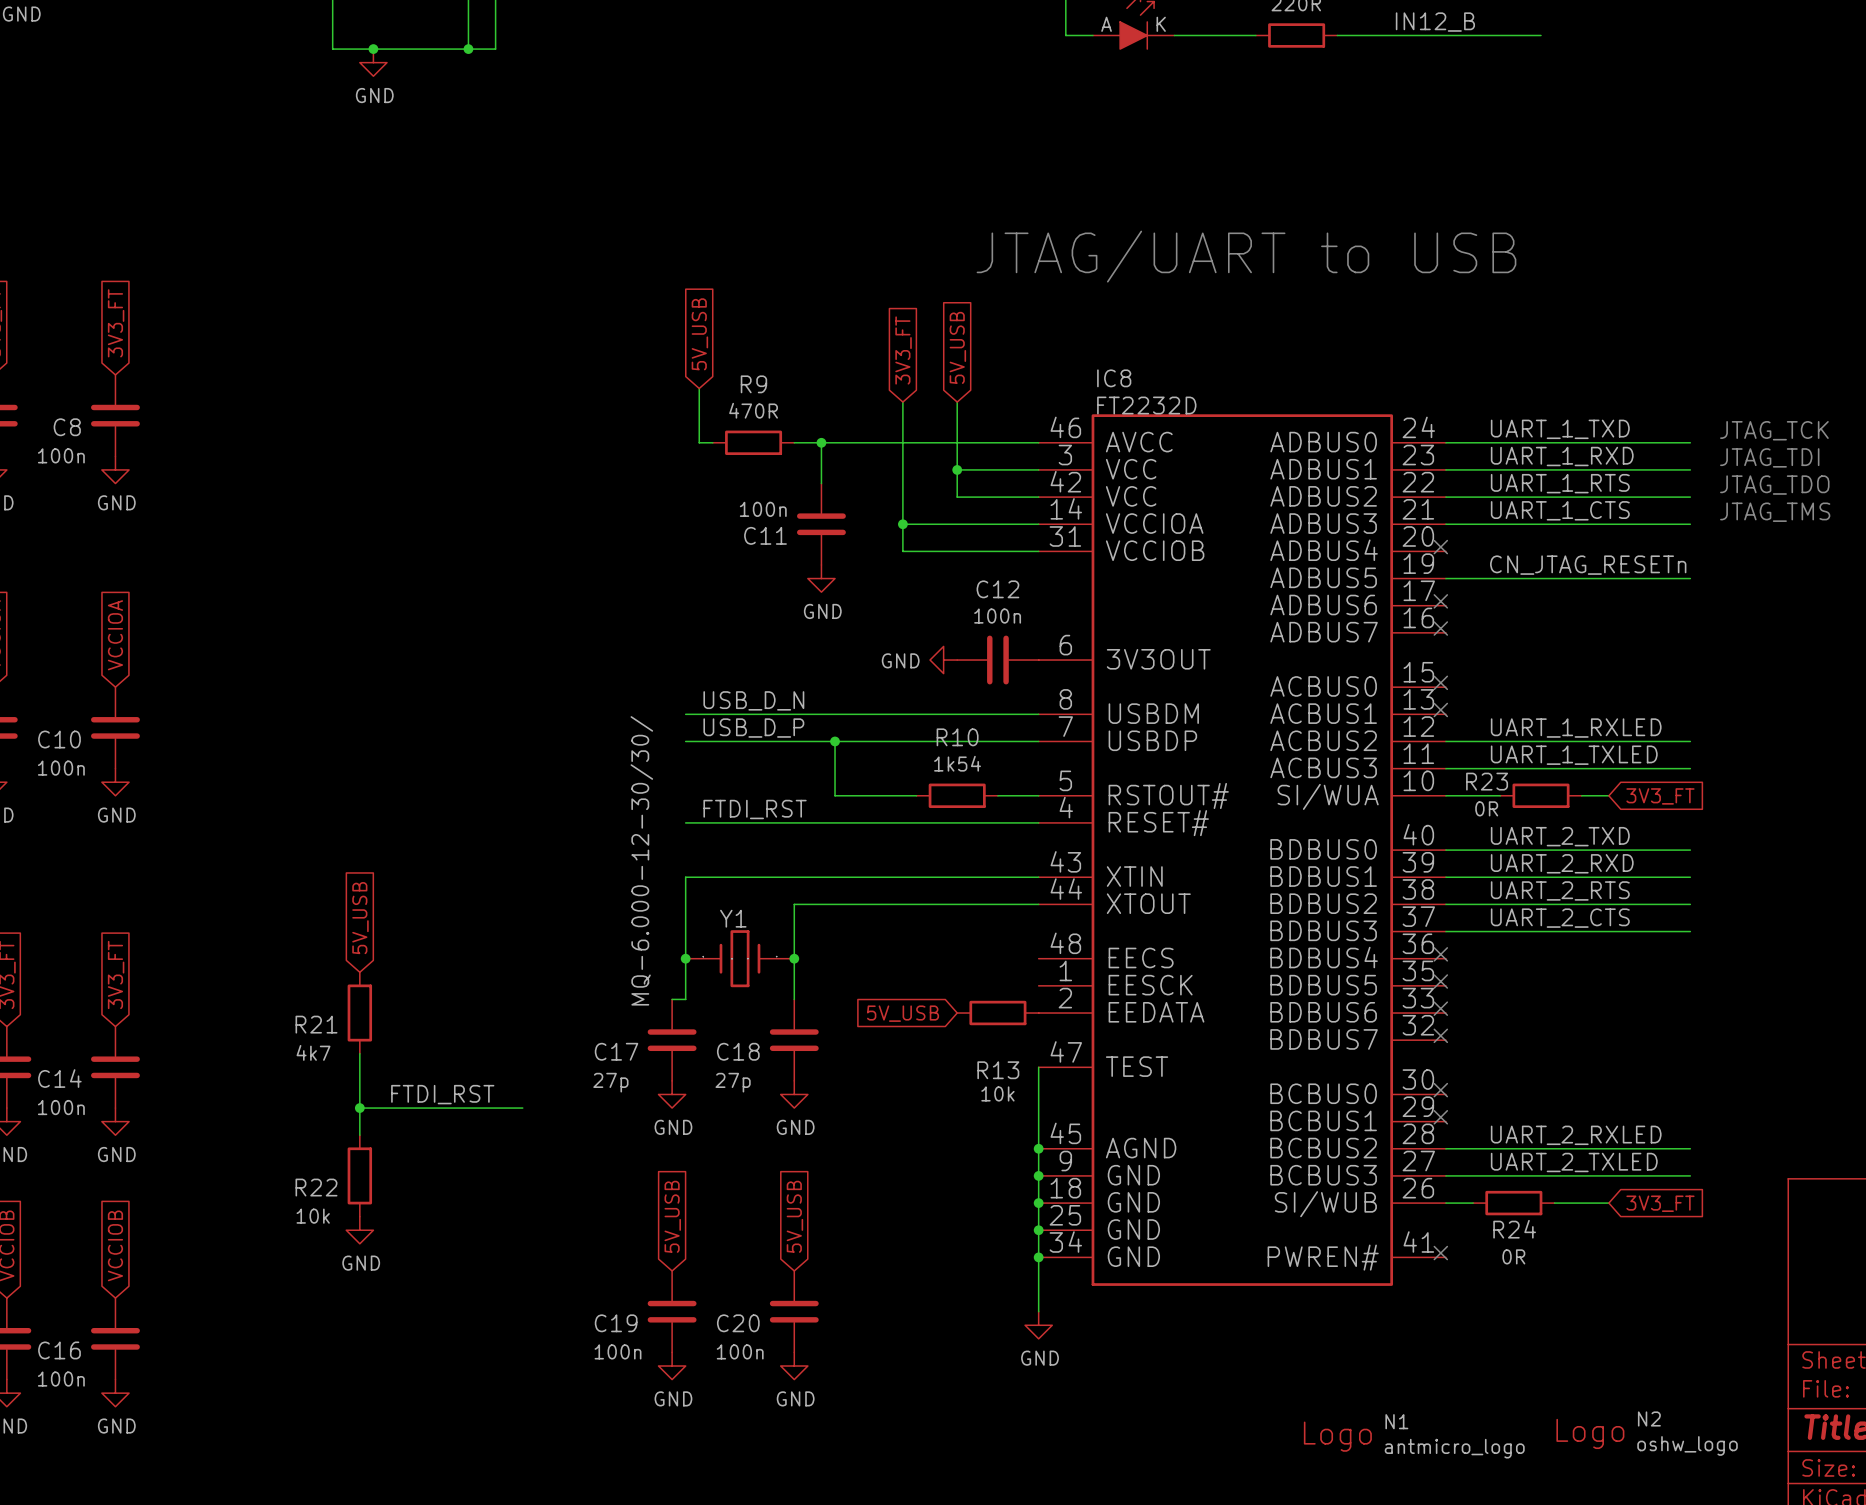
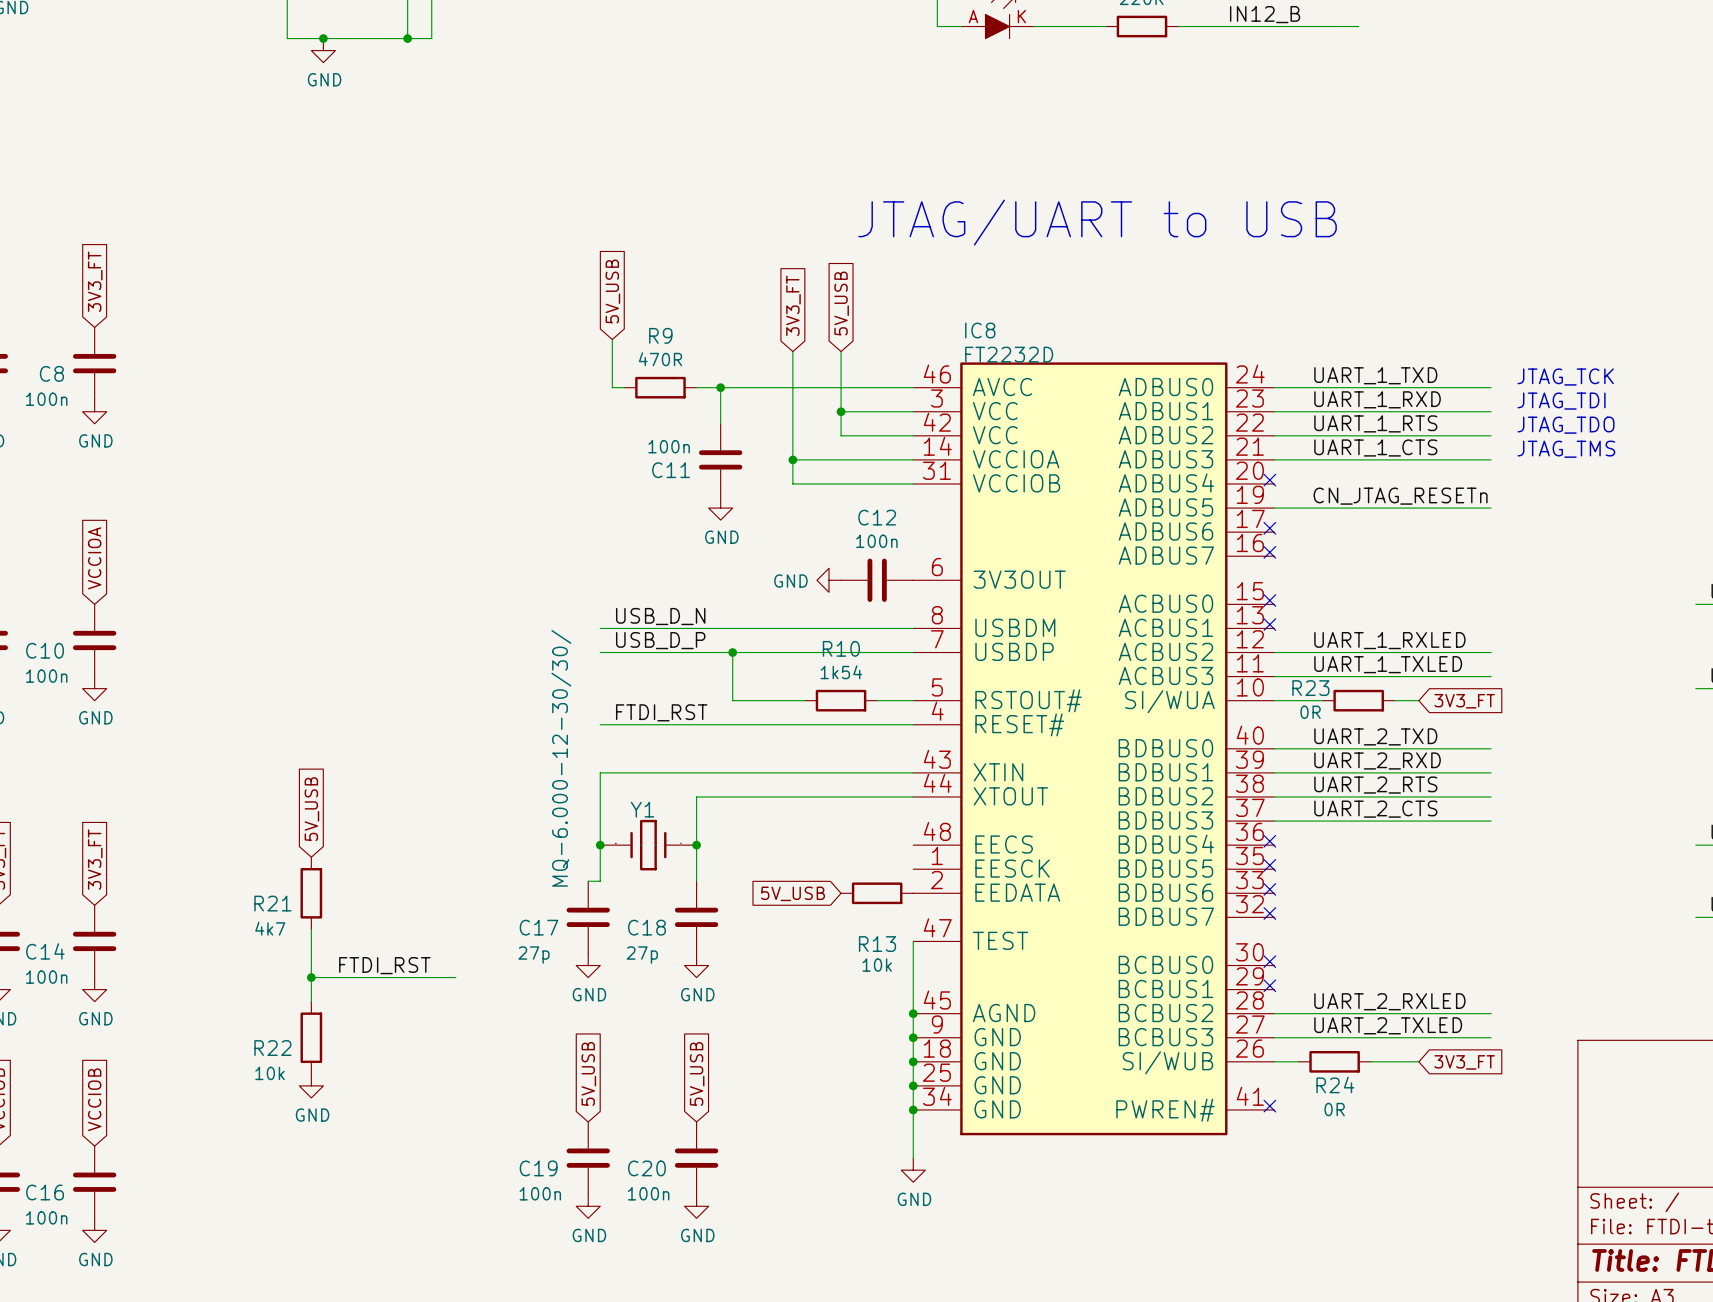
N2: oshw_logo (1647, 1433) -> none
N1: antmicro_logo (1414, 1436) -> none

